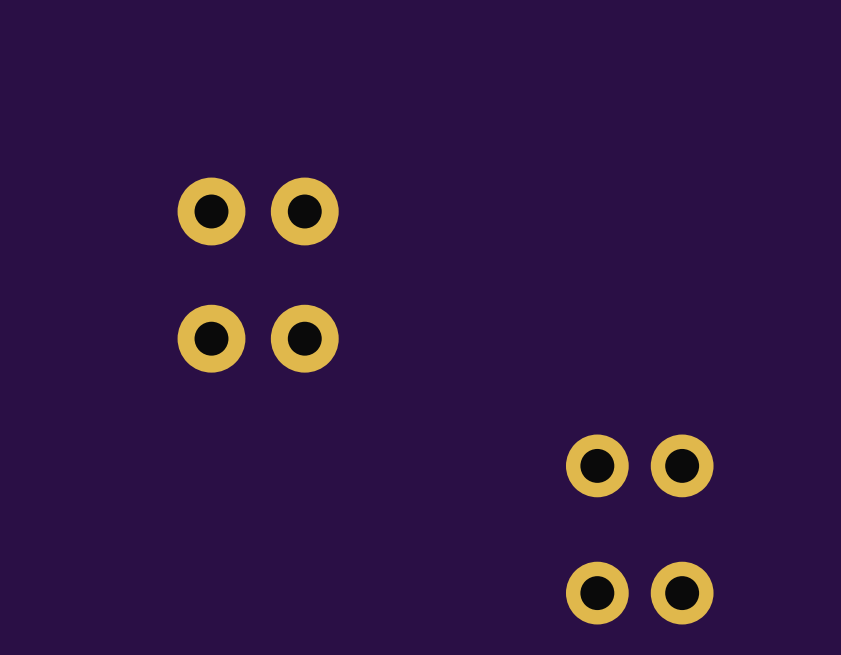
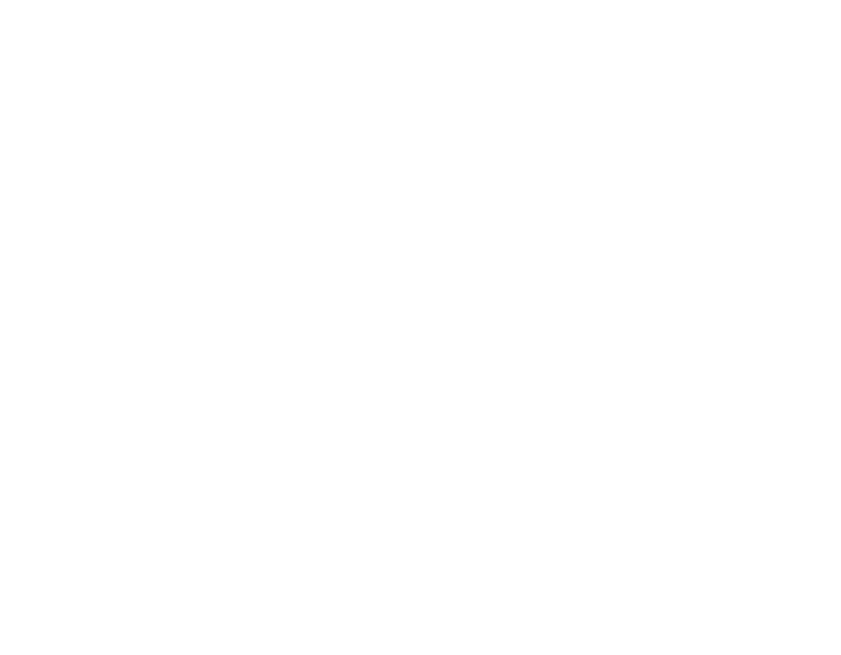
part: (258, 211) -> none
part: (258, 338) -> none
part: (639, 465) -> none
part: (639, 593) -> none

